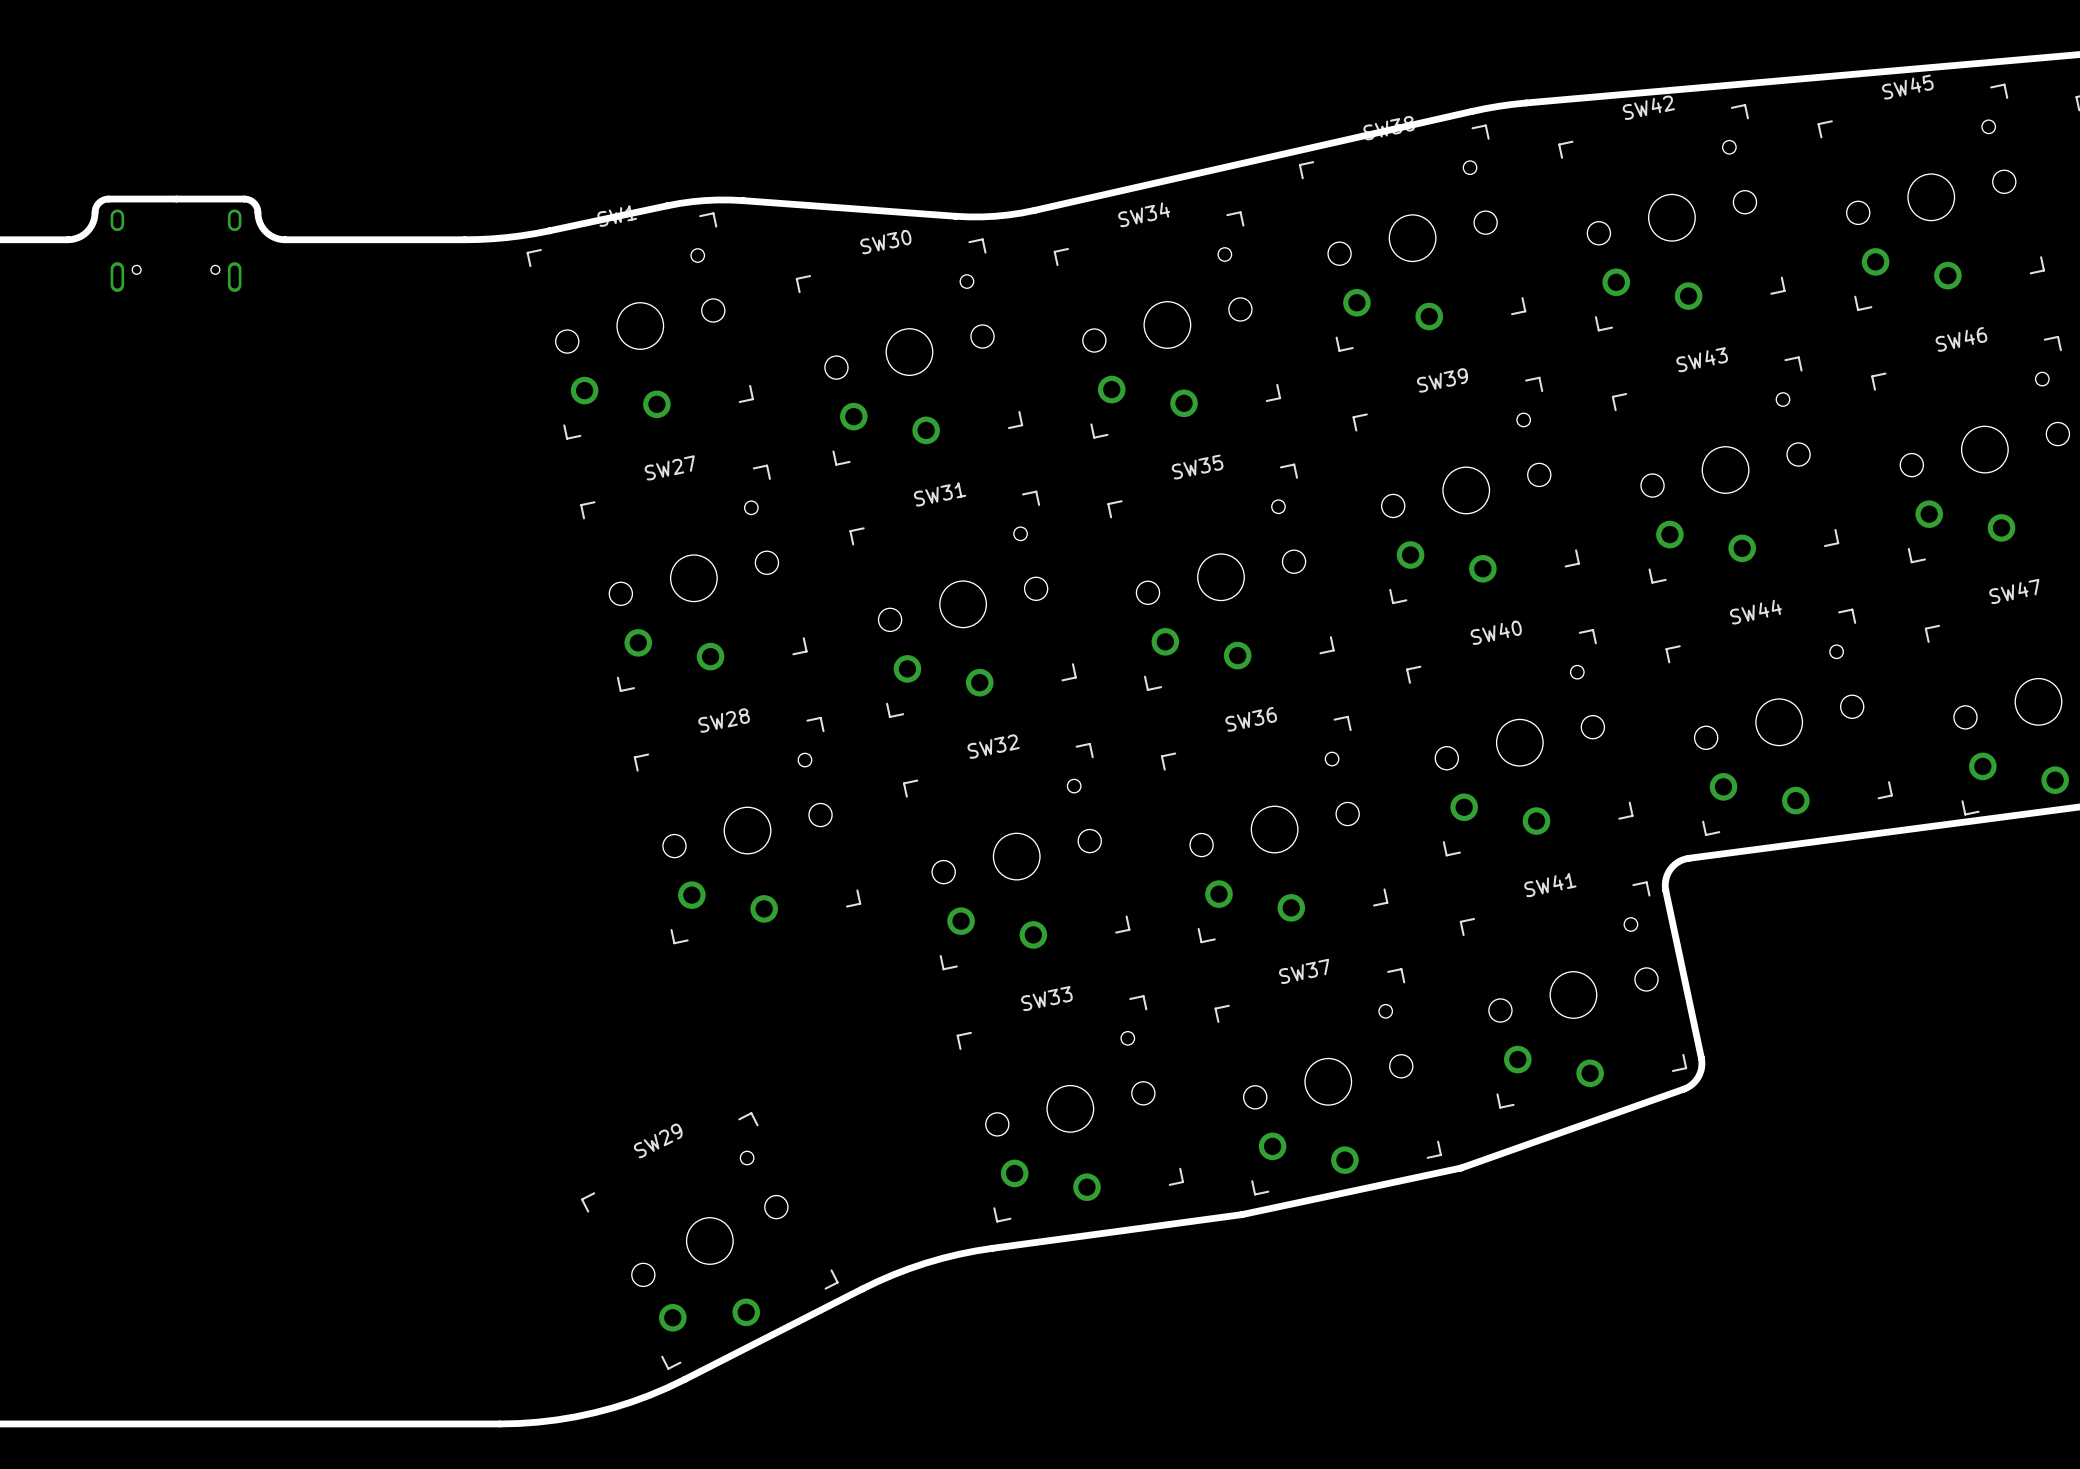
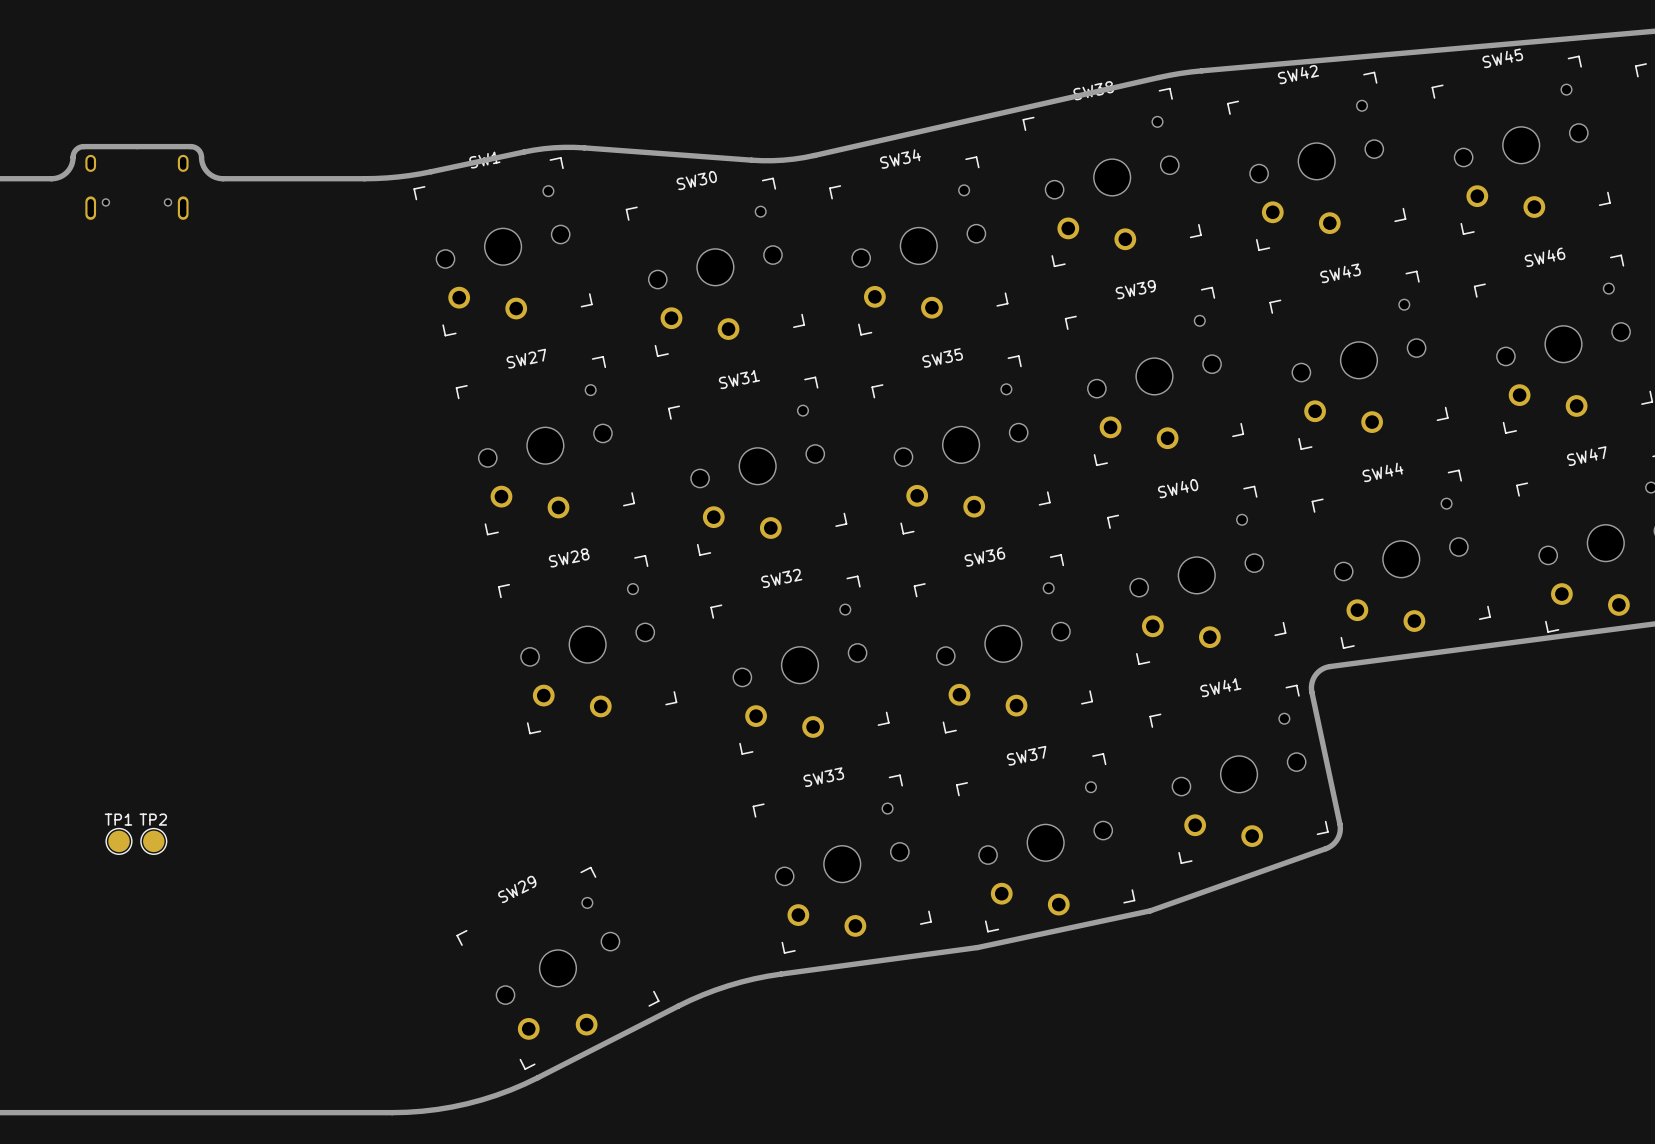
TP1: none -> (118, 841)
TP2: none -> (153, 841)

